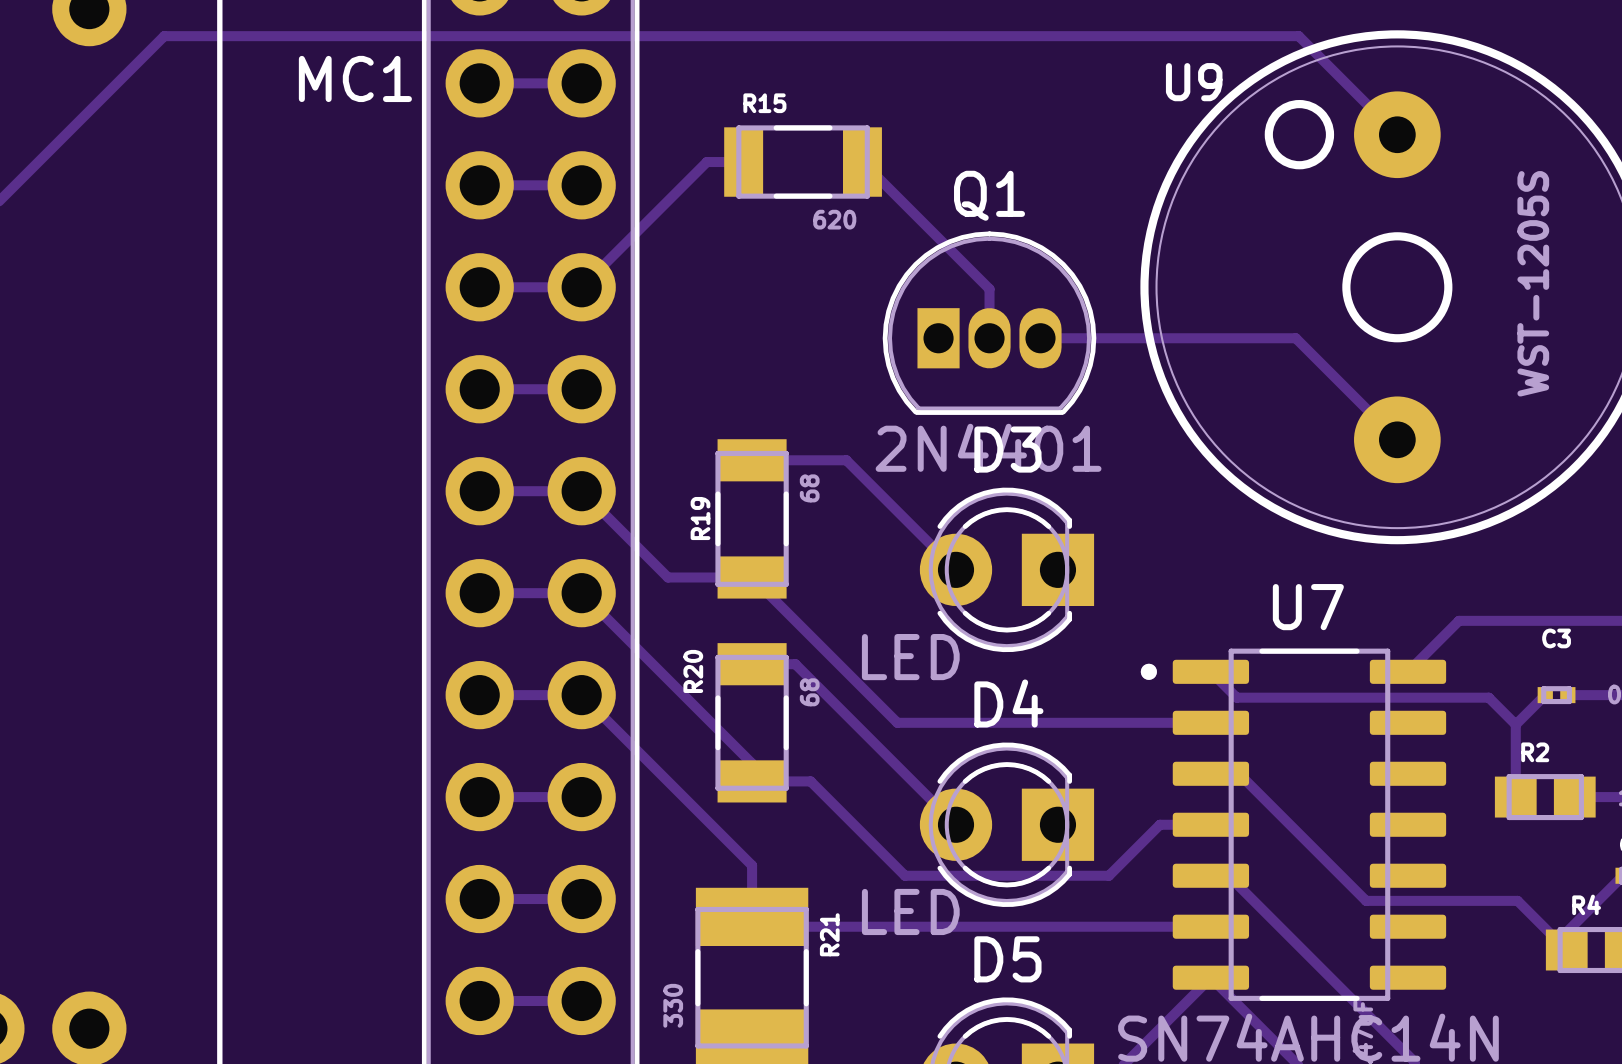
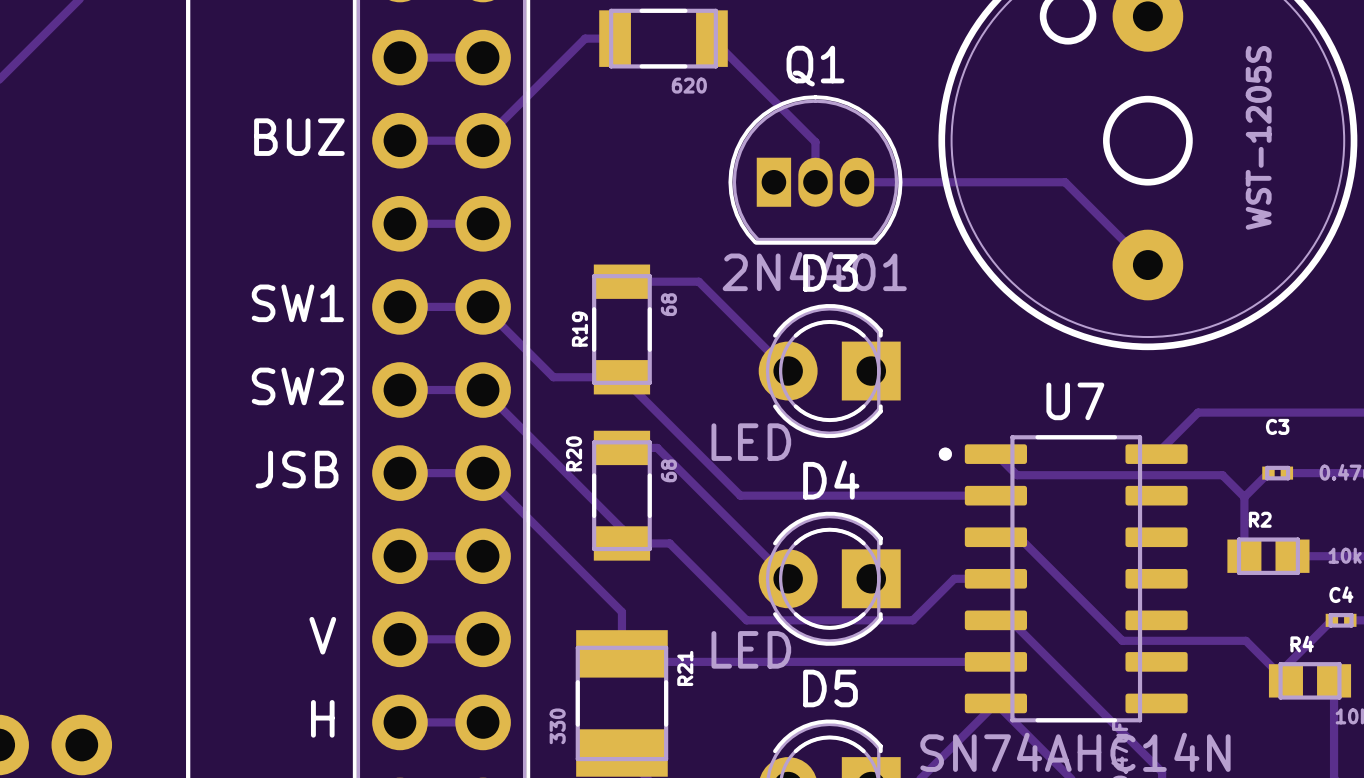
text: none -> BUZ (299, 137)
text: none -> SW1 (297, 303)
text: none -> SW2 (297, 386)
text: none -> JSB (297, 469)
text: none -> V (322, 635)
text: none -> H (322, 718)

